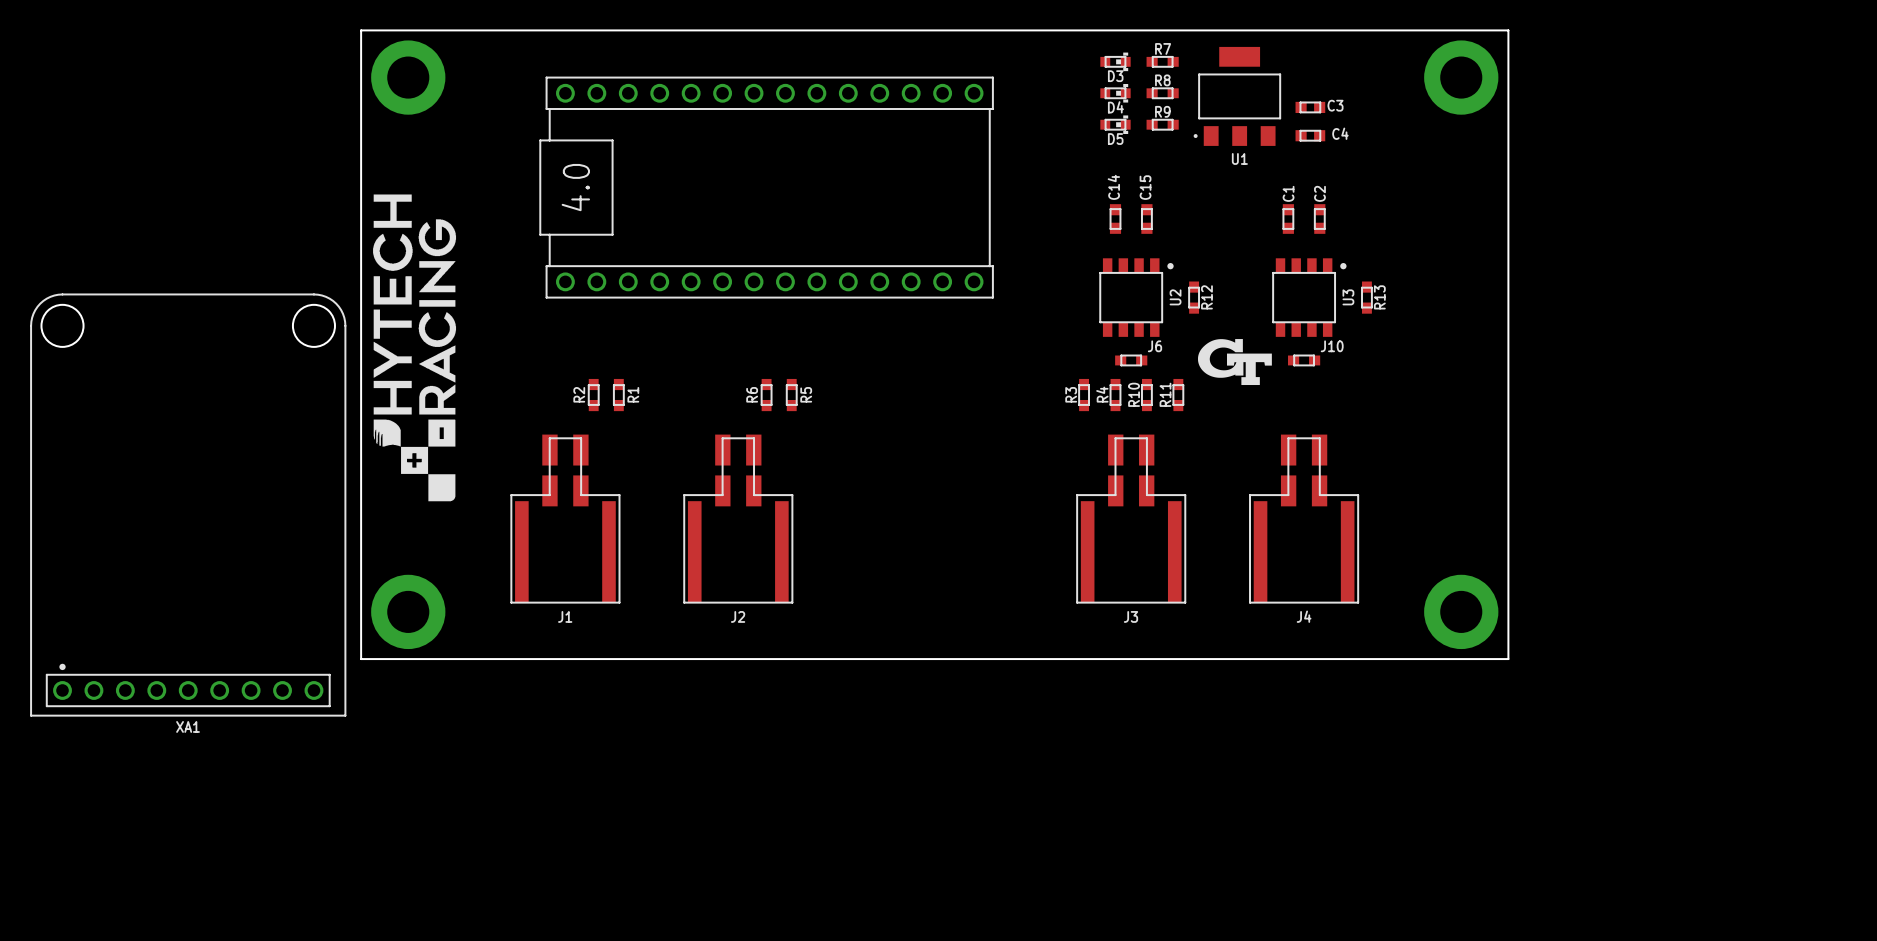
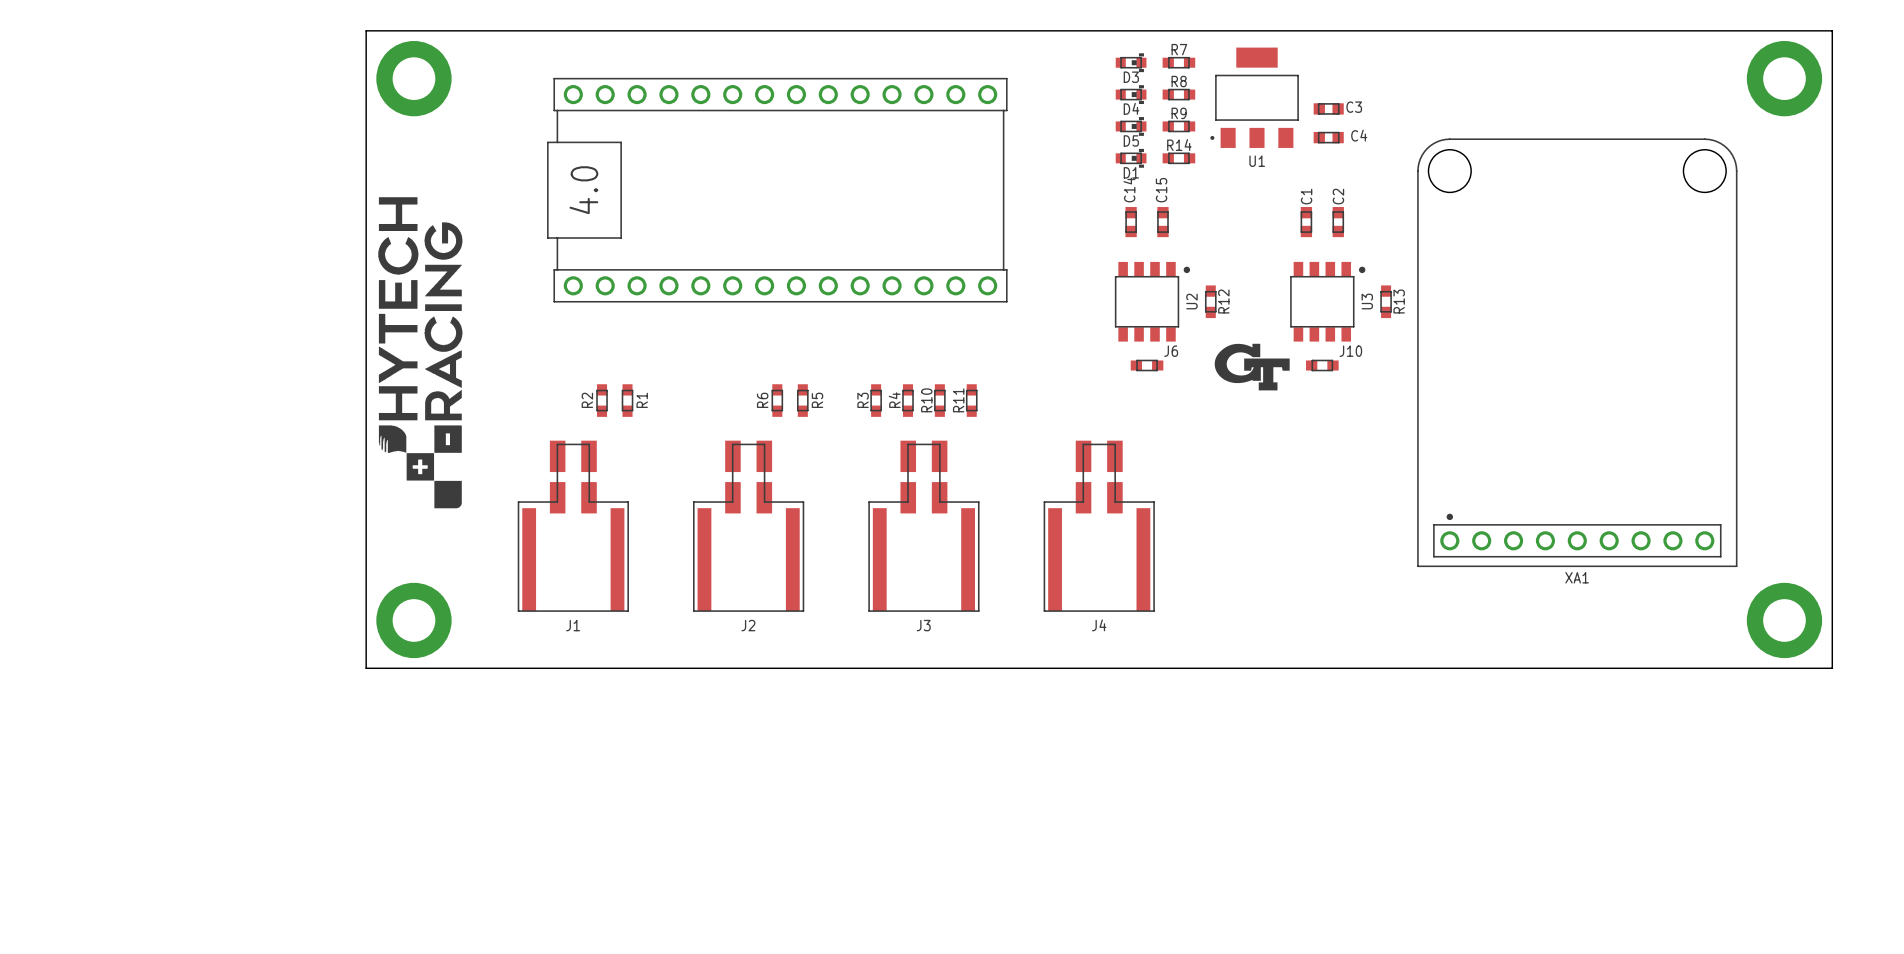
board edge: (1508, 30) (1508, 659) -> (1529, 30) (1832, 30) (1832, 668) (1529, 668)
part position: (1461, 77) -> (1784, 78)
D1: none -> (1131, 158)
R14: none -> (1178, 158)
R3 position: (1084, 395) -> (876, 400)
R4 position: (1115, 395) -> (907, 400)
R10 position: (1146, 395) -> (939, 400)
R11 position: (1178, 395) -> (971, 400)
XA1 position: (188, 505) -> (1577, 352)
J3 position: (1131, 519) -> (923, 526)
J4 position: (1304, 519) -> (1099, 526)
part position: (1461, 611) -> (1784, 620)

